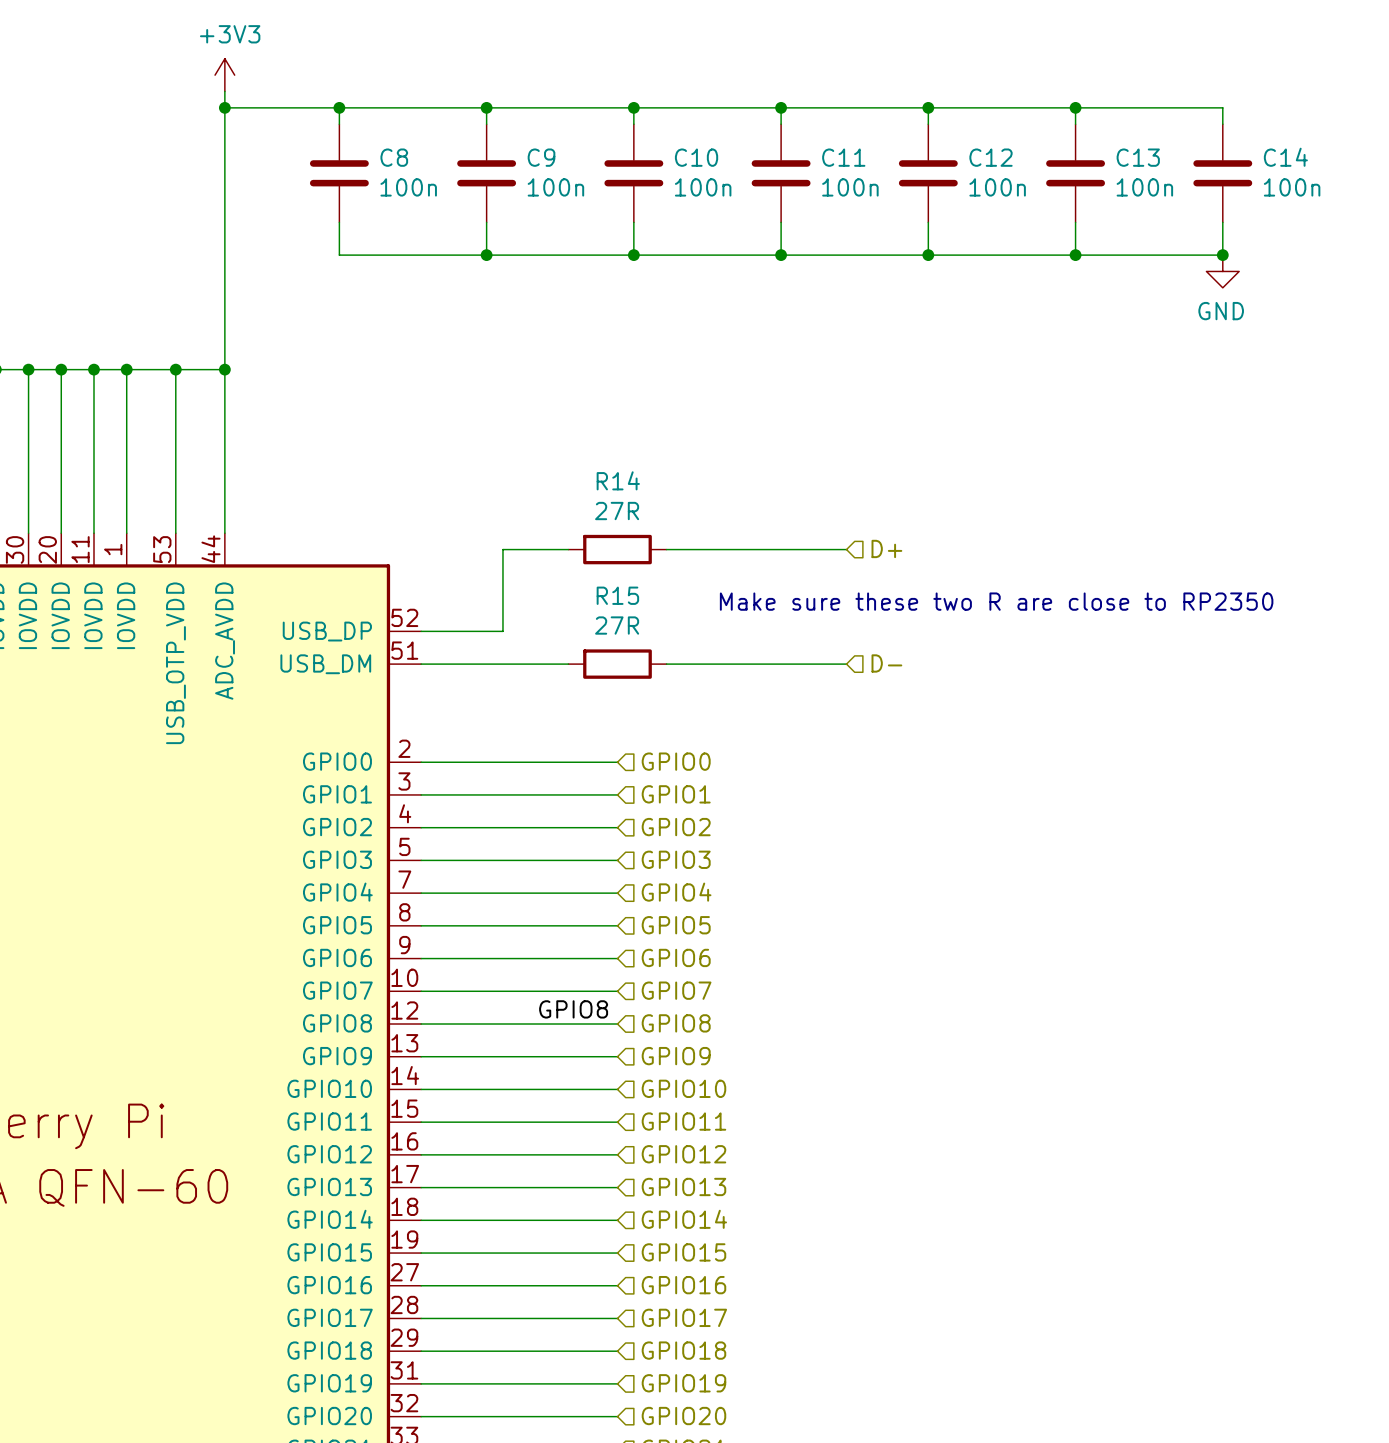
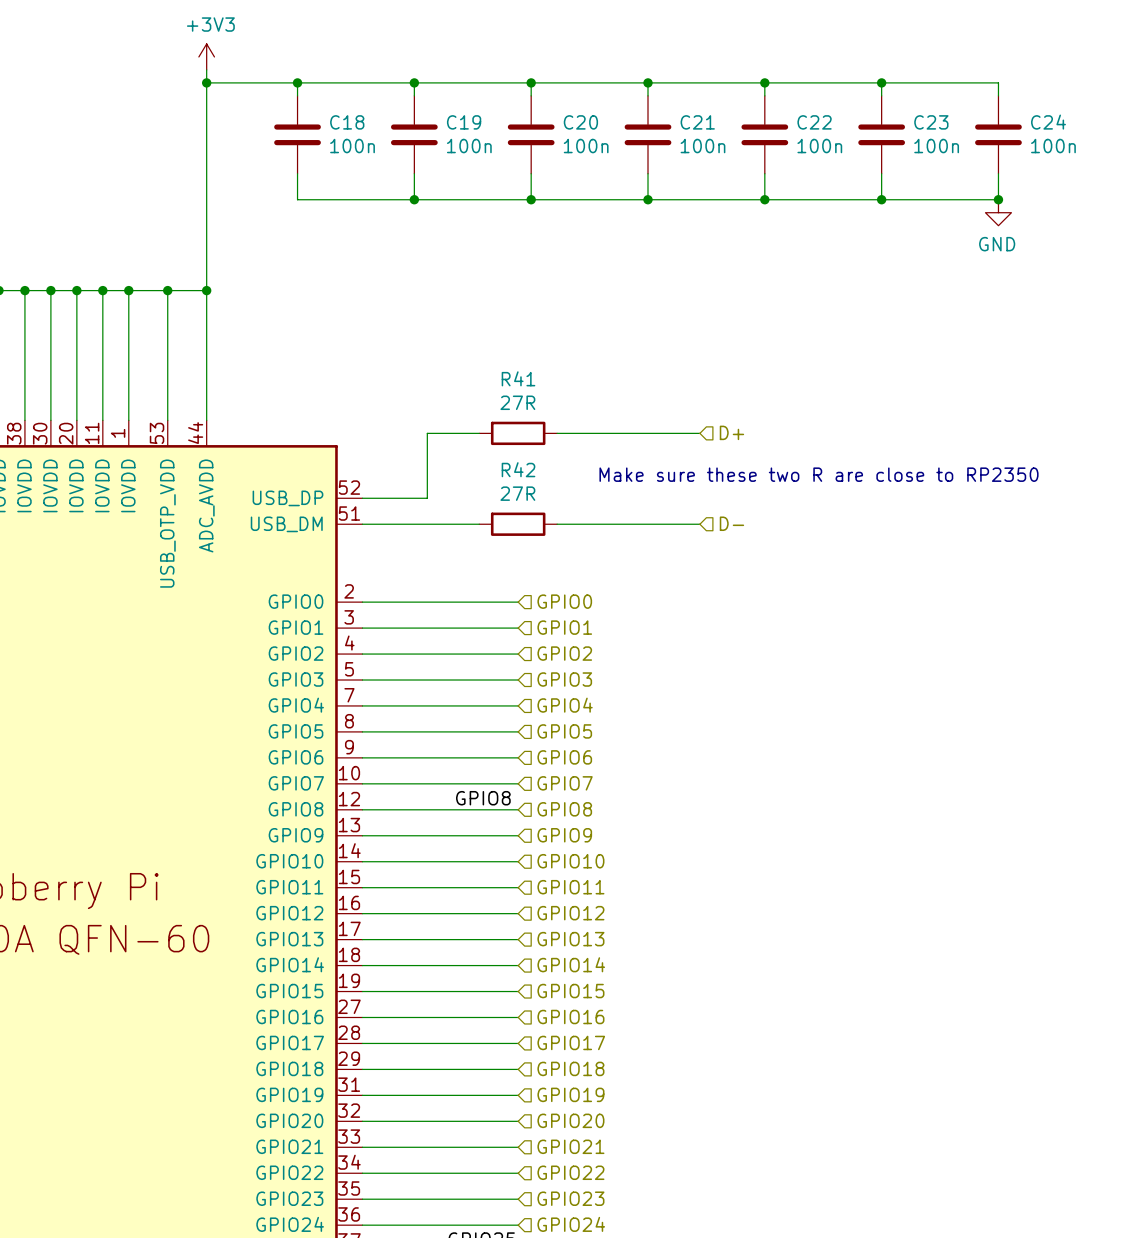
C8 name: C8 (394, 157) -> C18 (347, 122)
C9 name: C9 (541, 157) -> C19 (464, 122)
C10 name: C10 (696, 157) -> C20 (580, 122)
C11 name: C11 (843, 157) -> C21 (697, 122)
C12 name: C12 (991, 157) -> C22 (814, 122)
C13 name: C13 (1138, 157) -> C23 (931, 122)
C14 name: C14 (1285, 157) -> C24 (1048, 122)
R14 name: R14 (618, 480) -> R41 (518, 378)
R15 name: R15 (617, 595) -> R42 (518, 469)

